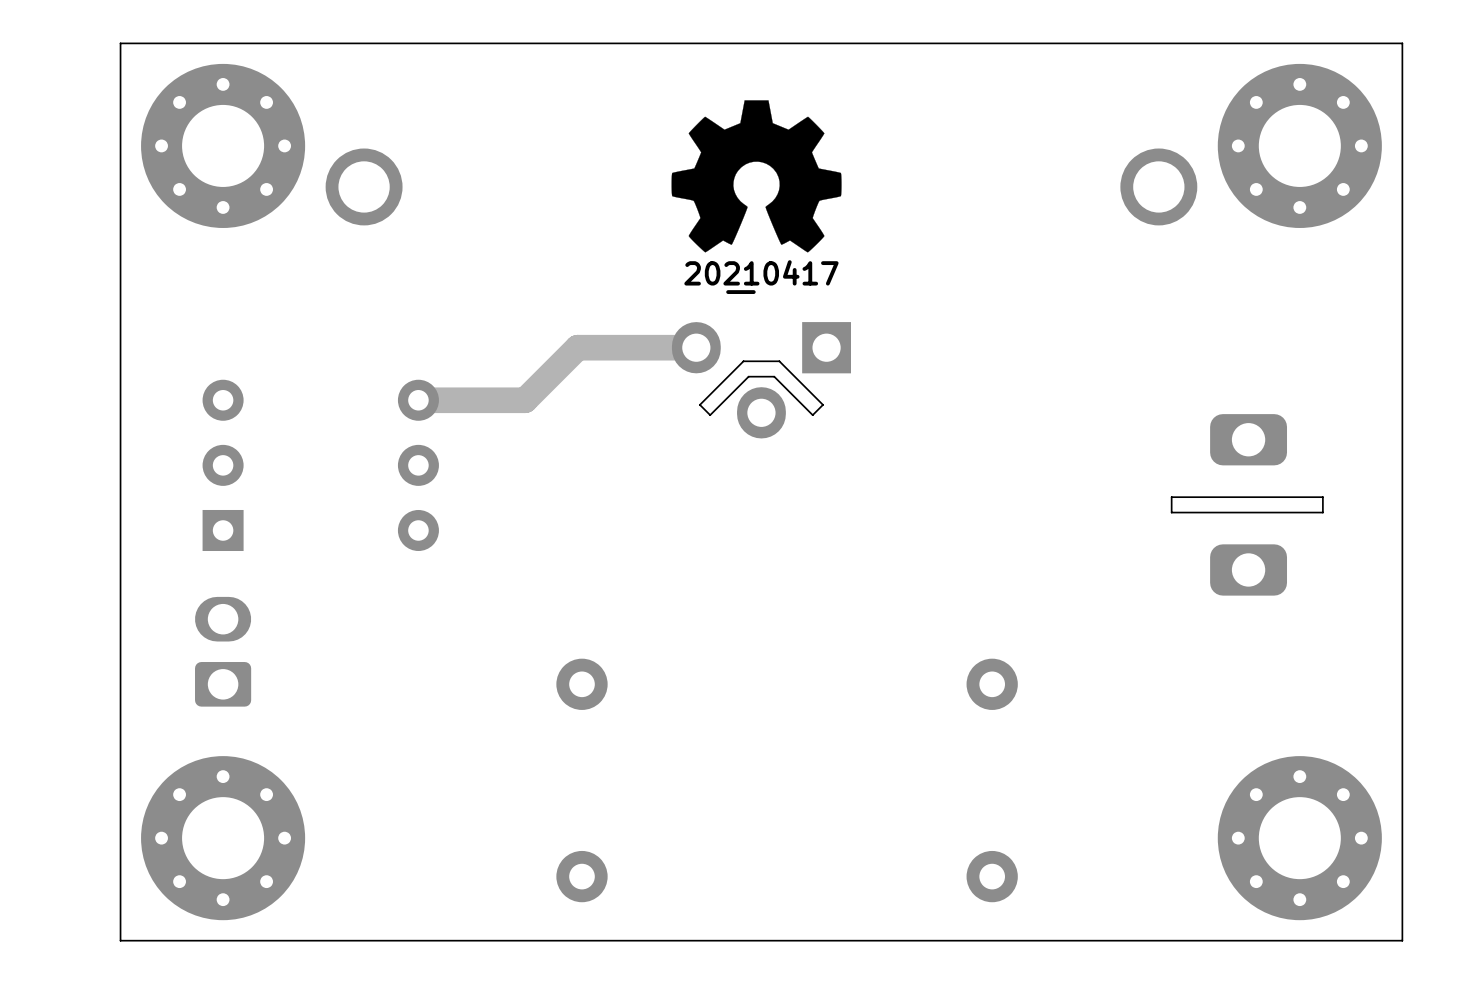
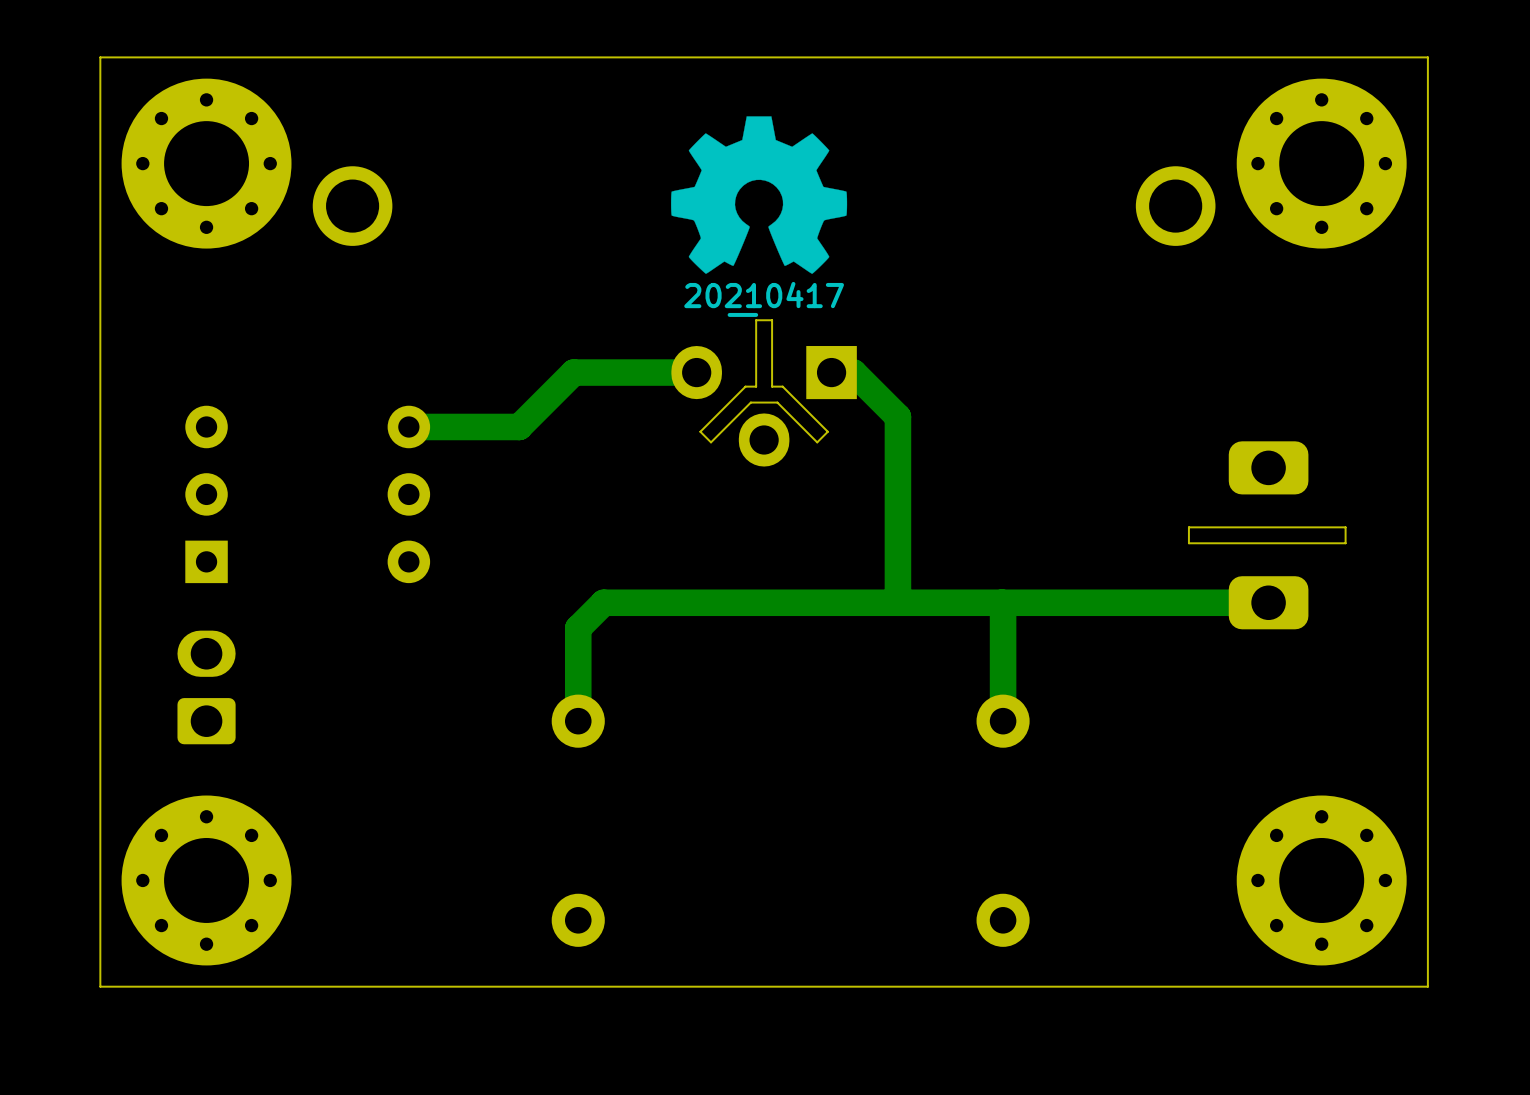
track: none -> (831, 372) (853, 372) (897, 416) (897, 602)
board edge: (769, 361) (753, 361) -> (772, 386) (772, 320) (756, 320) (756, 386)
track: none -> (1002, 602) (1003, 721)
track: none -> (1268, 602) (603, 602) (578, 628) (578, 721)

